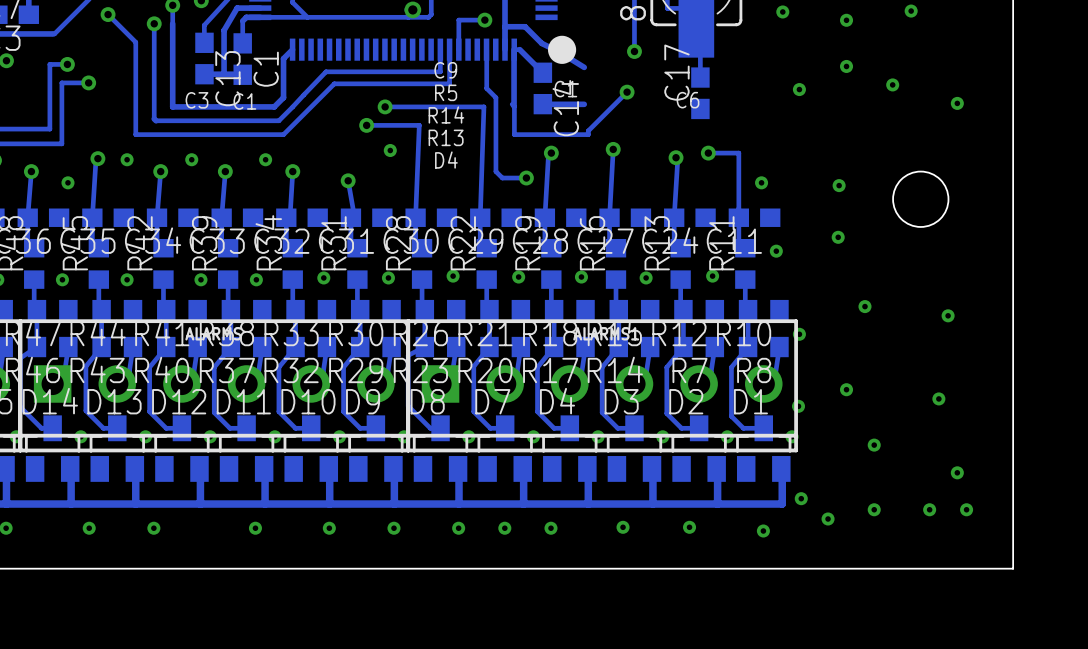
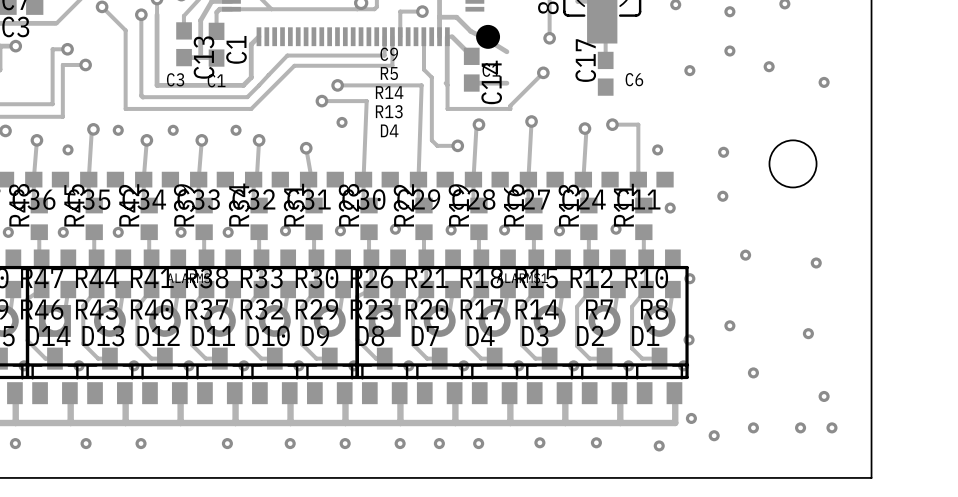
text position: C6 (687, 100) -> C6 (634, 79)

